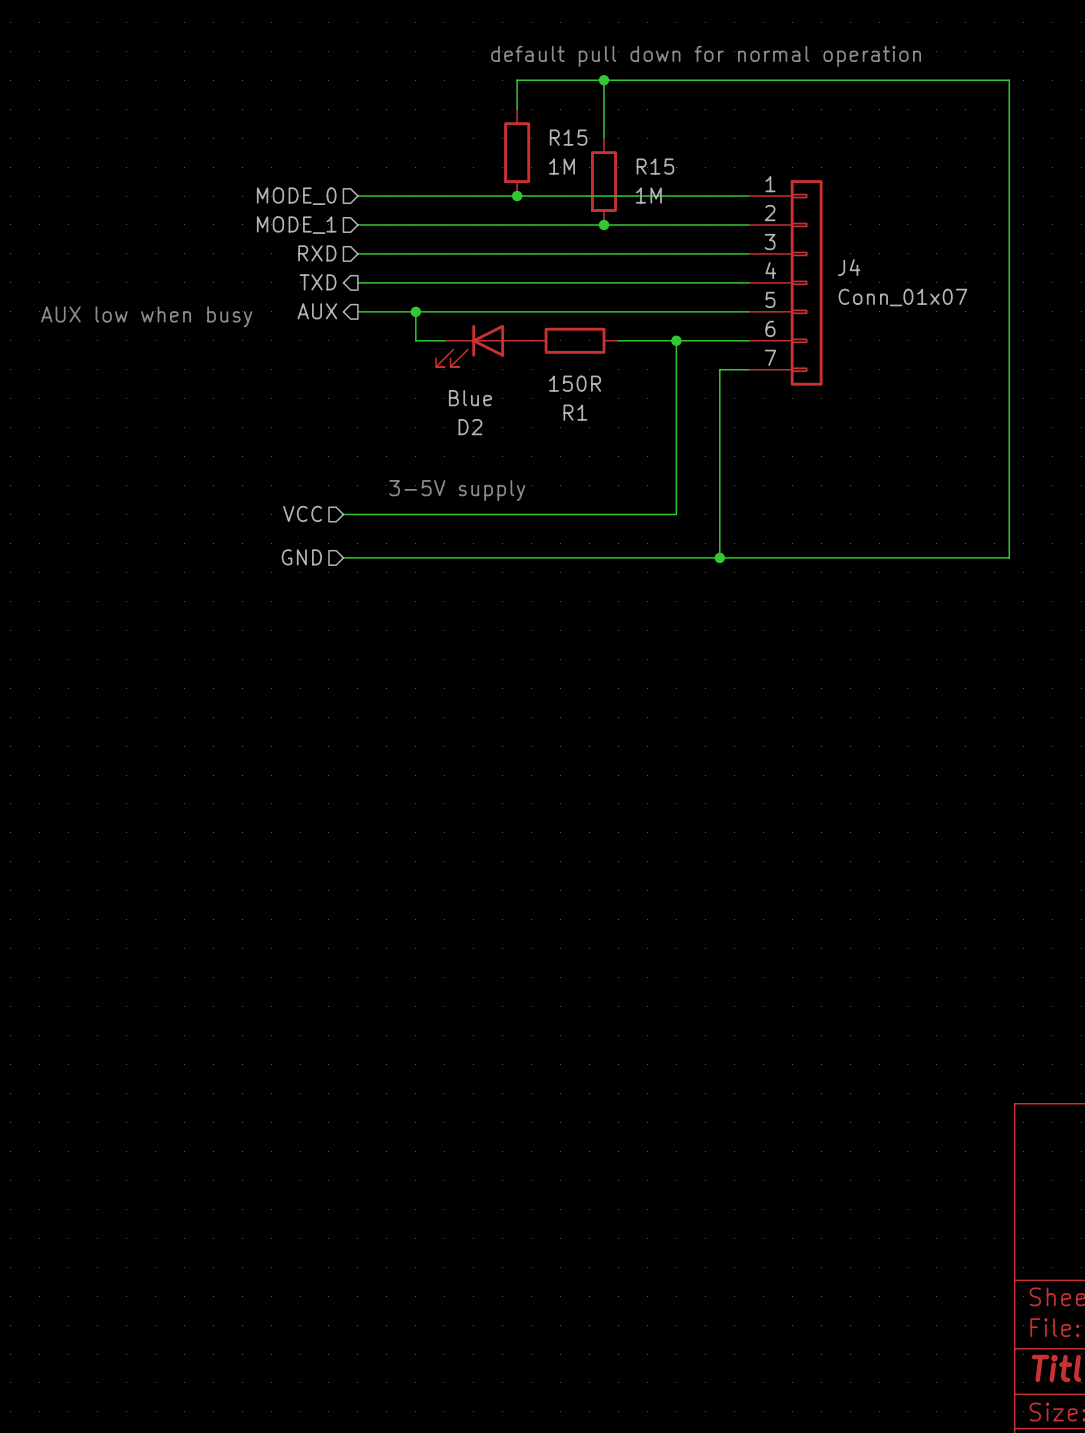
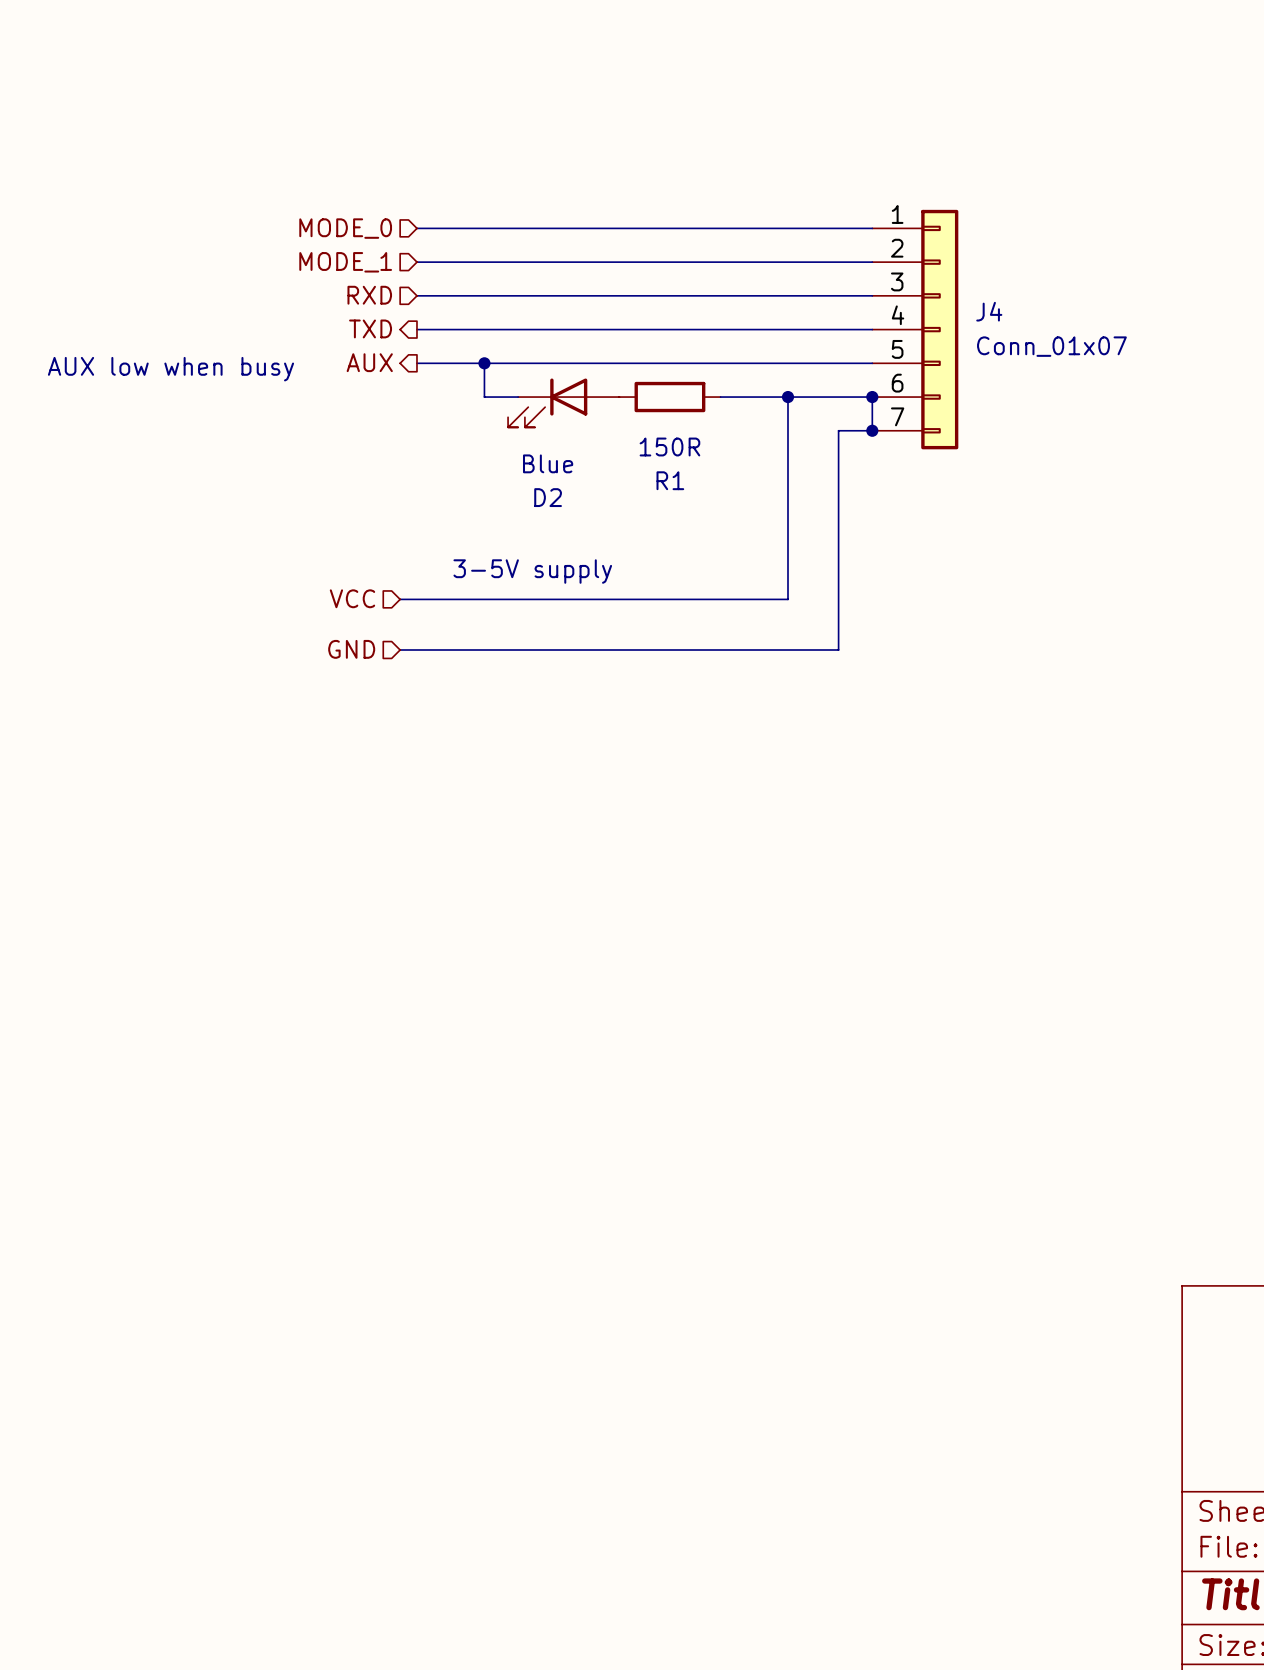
text: default pull down for normal operation (706, 56) -> none
wire: (603, 80) (603, 138) -> none
junction: (603, 80) -> none
wire: (517, 109) (517, 80) (1009, 80) (1009, 557) (719, 557) -> none
R15: 1M (517, 152) -> none
R15: 1M (603, 181) -> none
junction: (517, 196) -> none
junction: (603, 224) -> none
wire: none -> (872, 397) (872, 430)
junction: none -> (872, 397)
junction: none -> (872, 430)
junction: (719, 557) -> none

